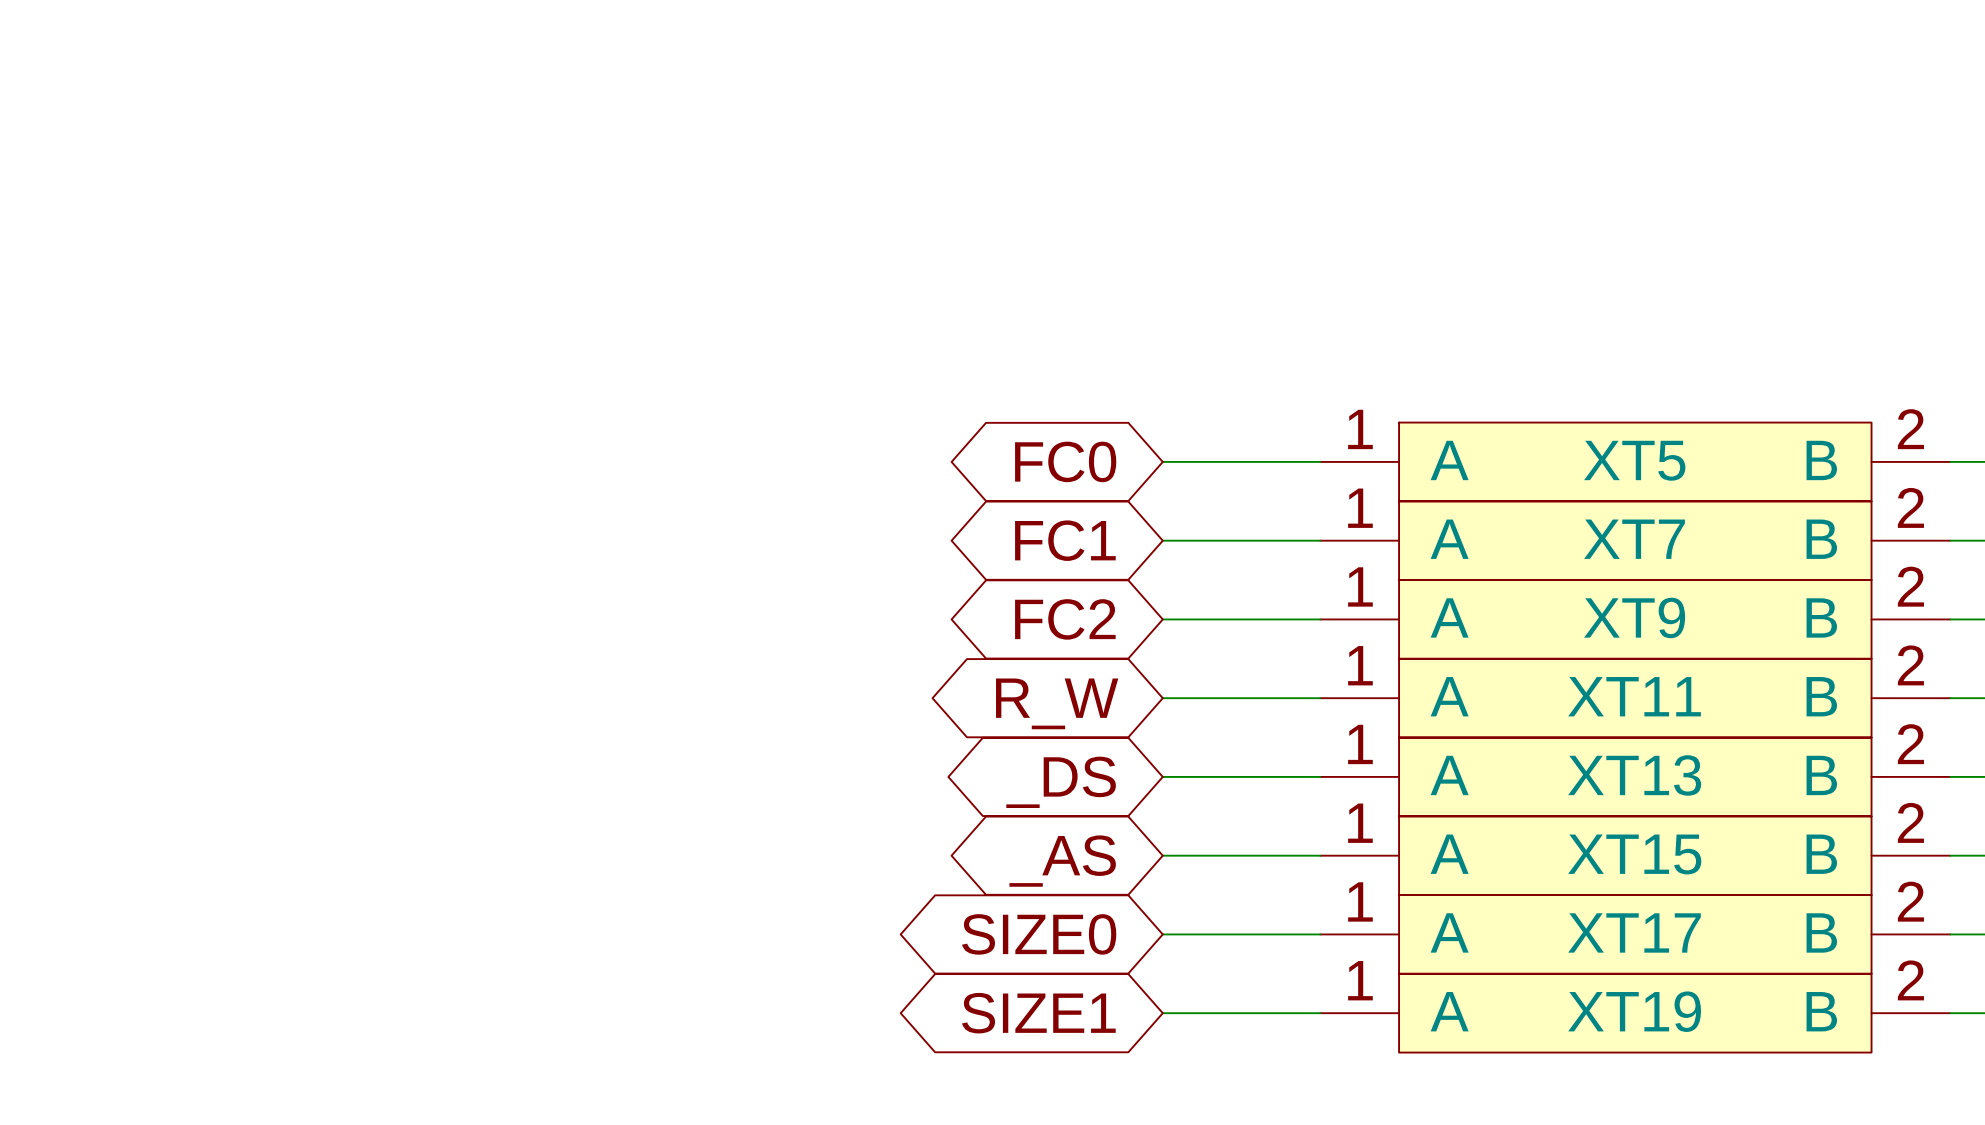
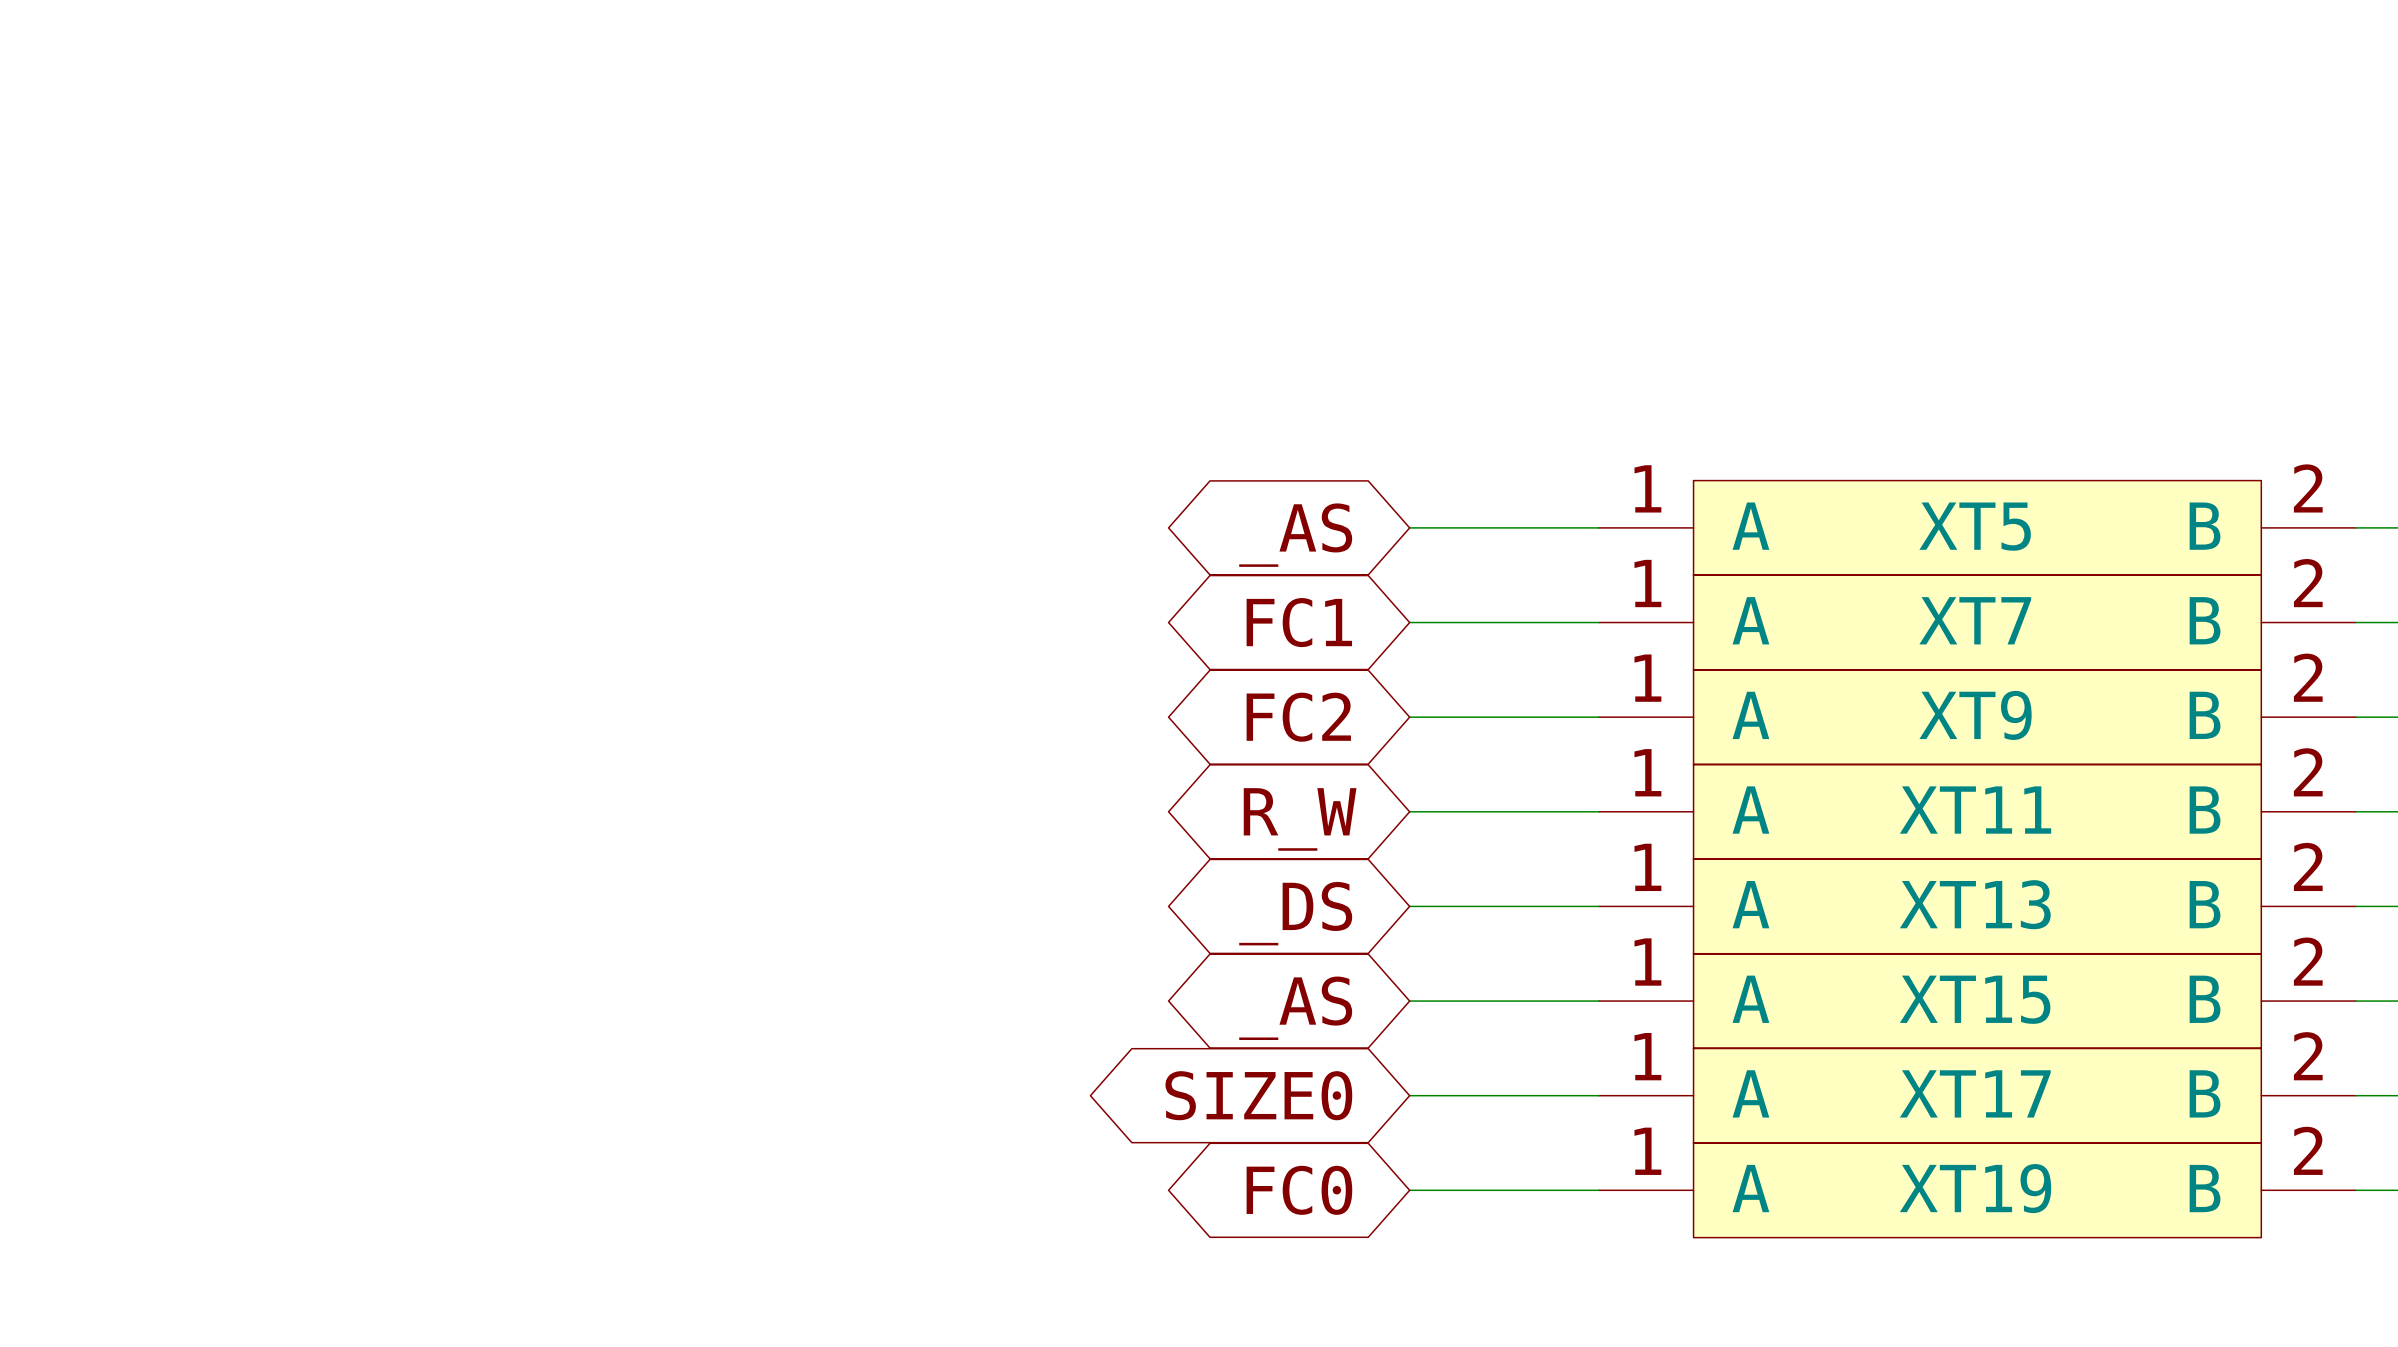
global label: FC0 (1065, 461) -> _AS (1295, 535)
global label: SIZE1 (1038, 1013) -> FC0 (1299, 1190)

